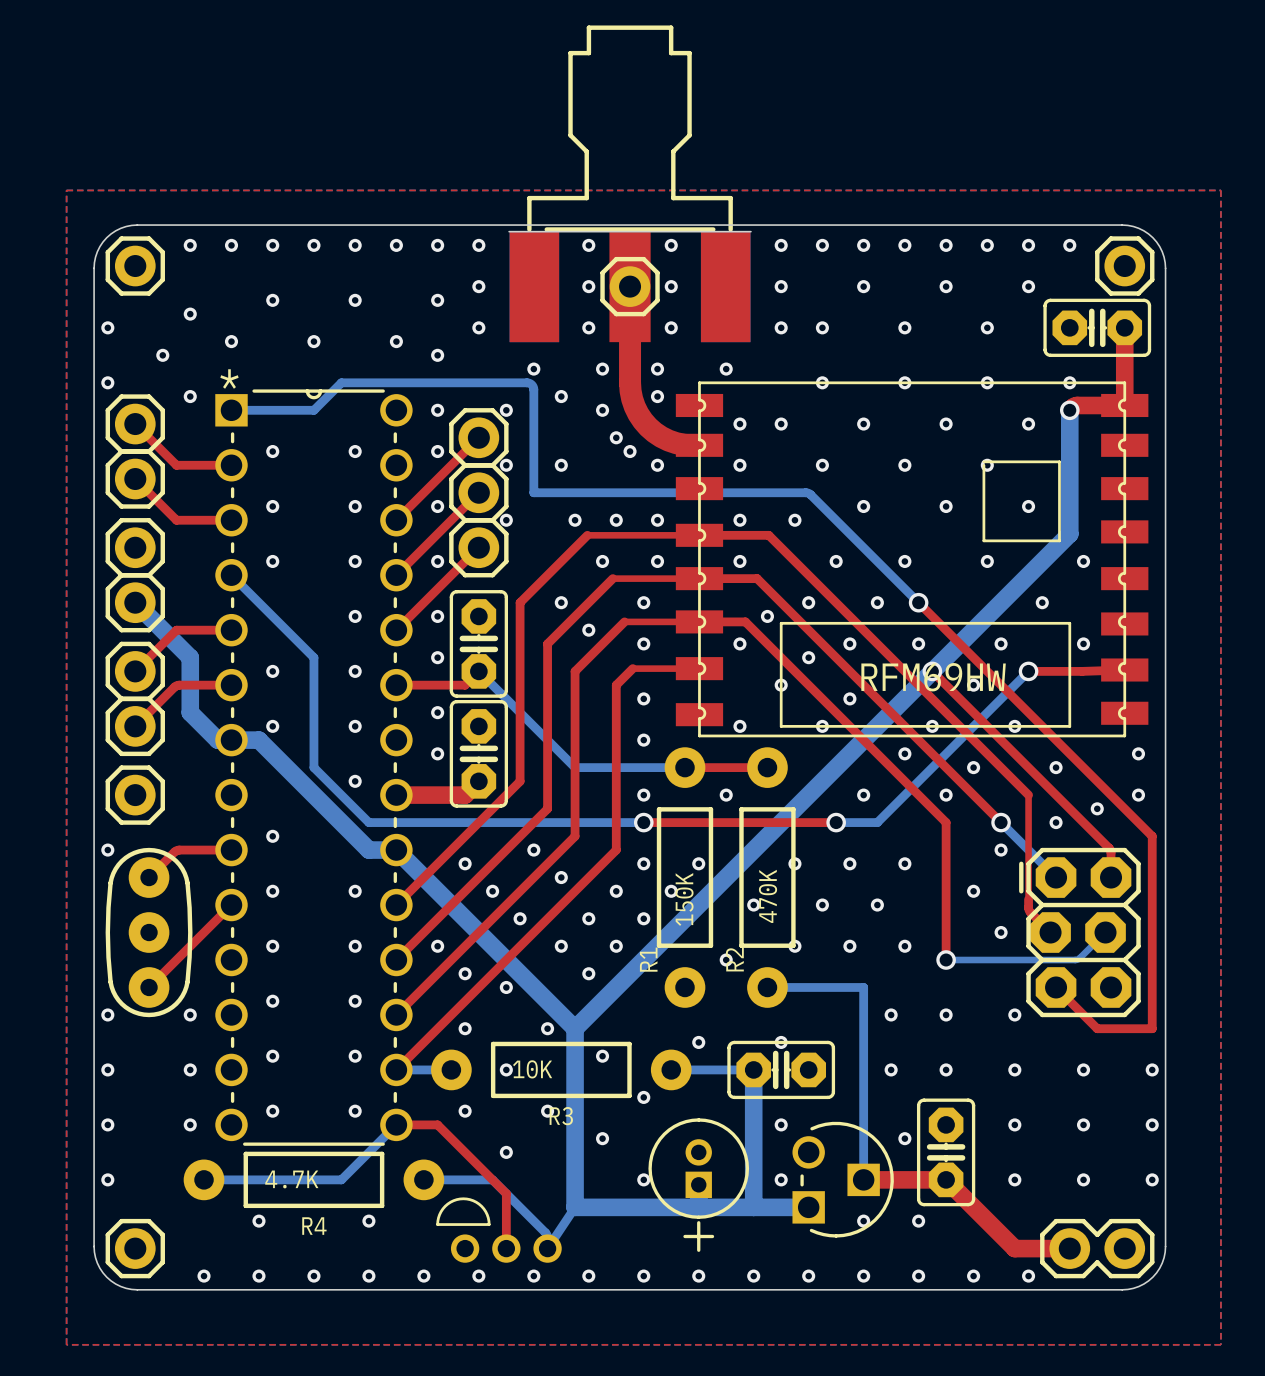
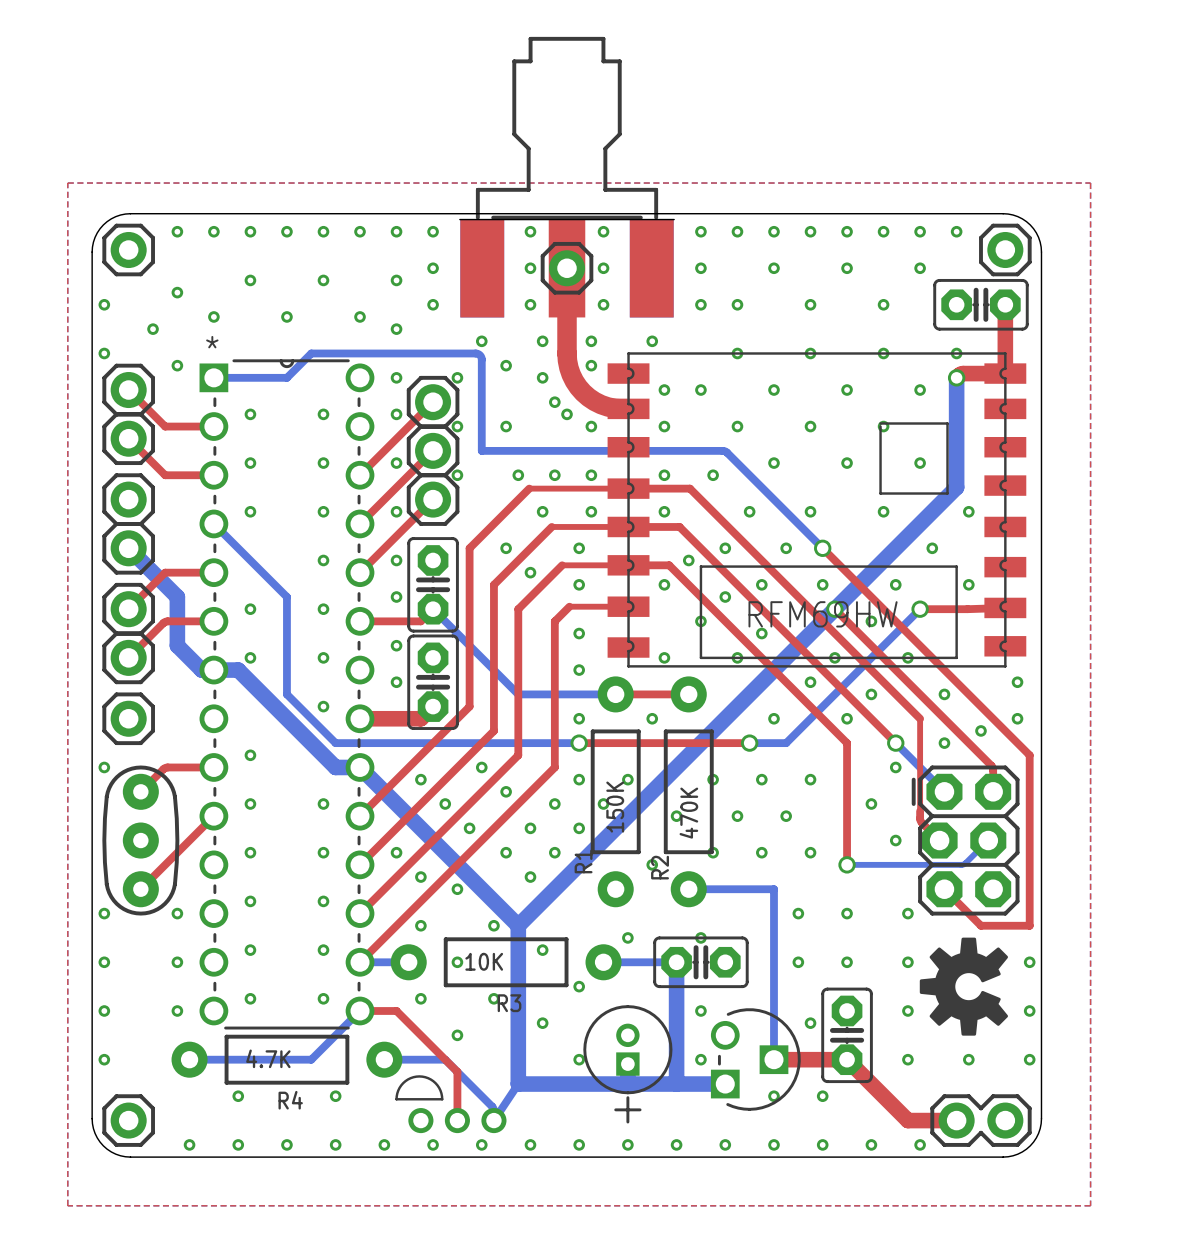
drawing: none -> [919, 937, 1009, 1036]

